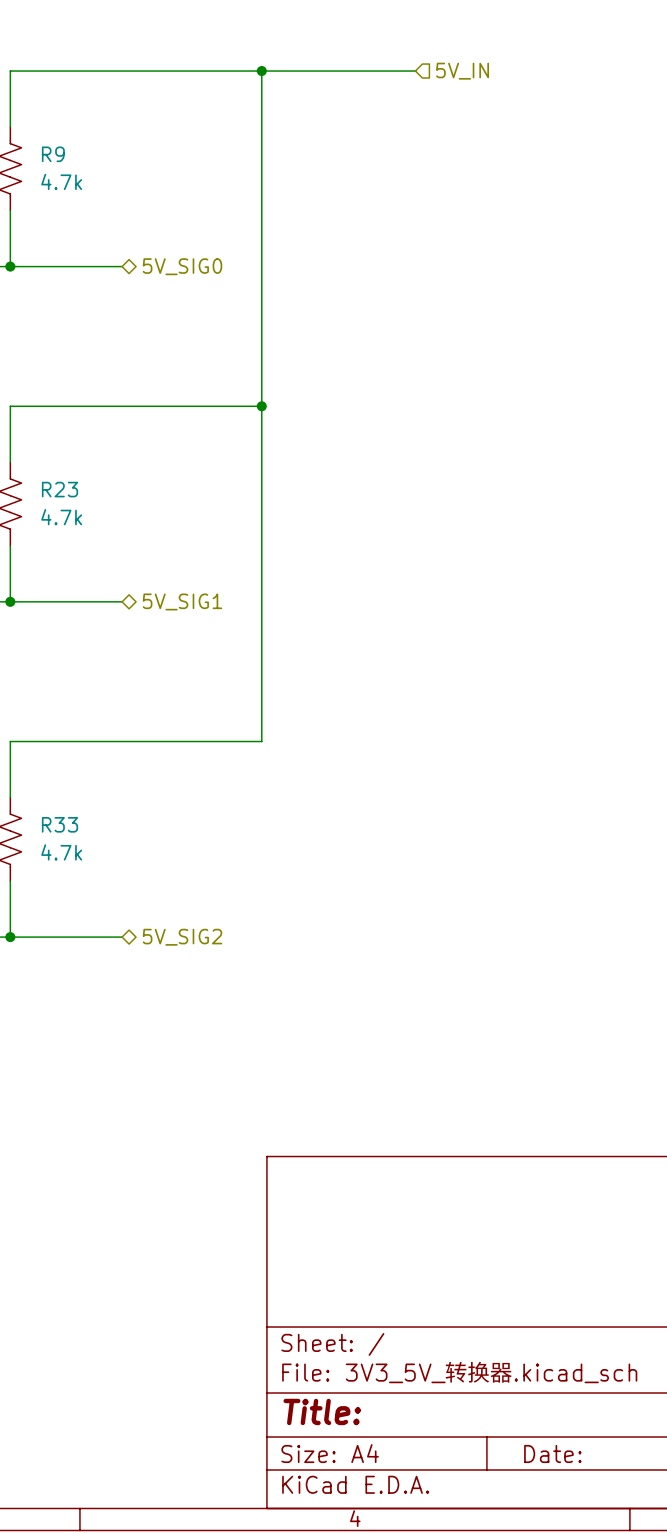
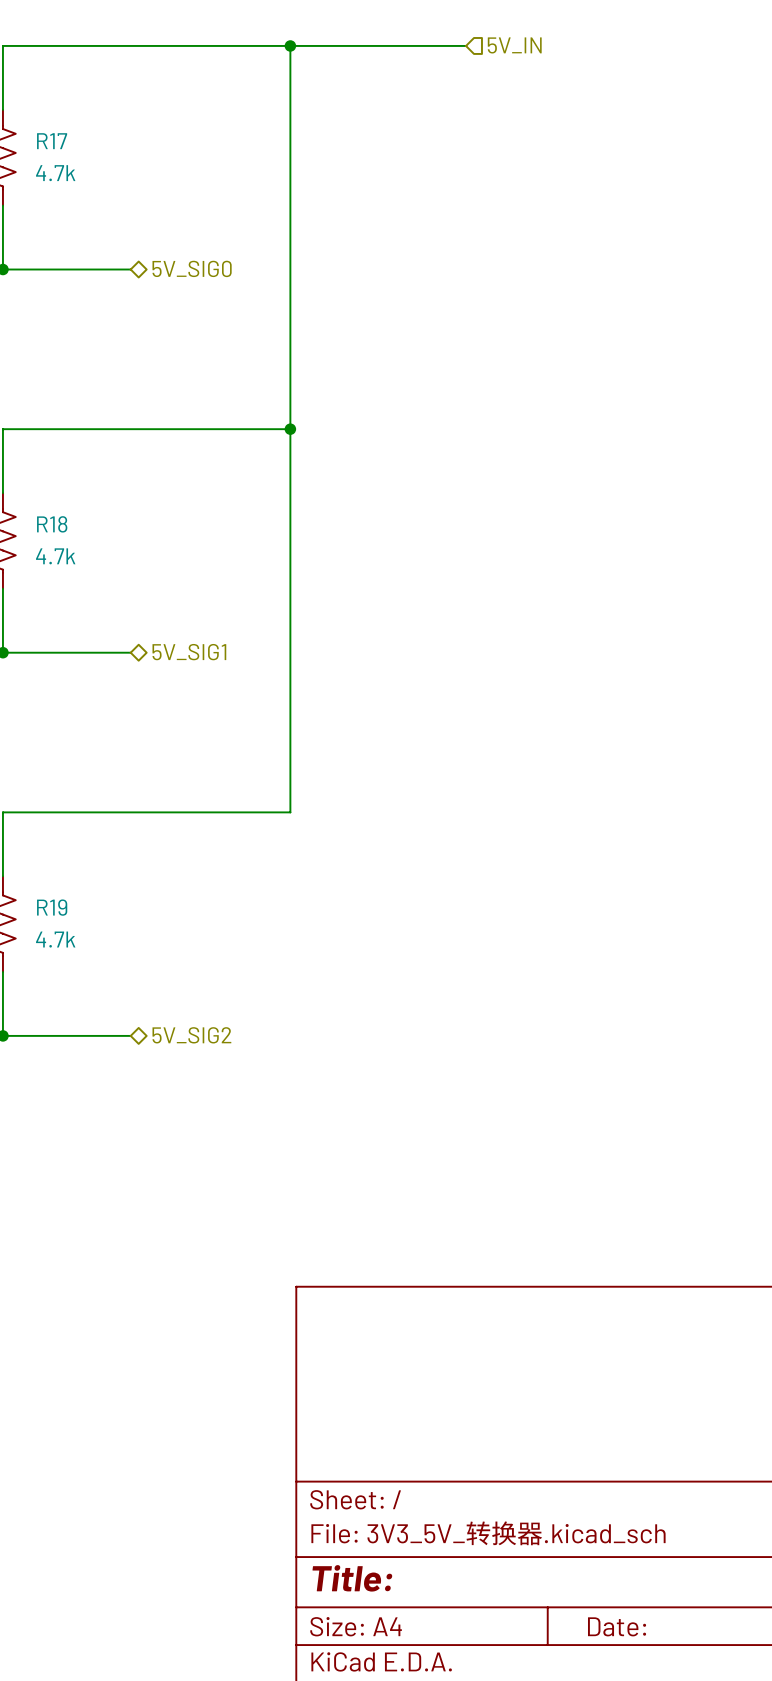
R9 name: R9 (53, 154) -> R17 (52, 141)
R23 name: R23 (60, 489) -> R18 (52, 524)
R33 name: R33 (60, 824) -> R19 (52, 907)

